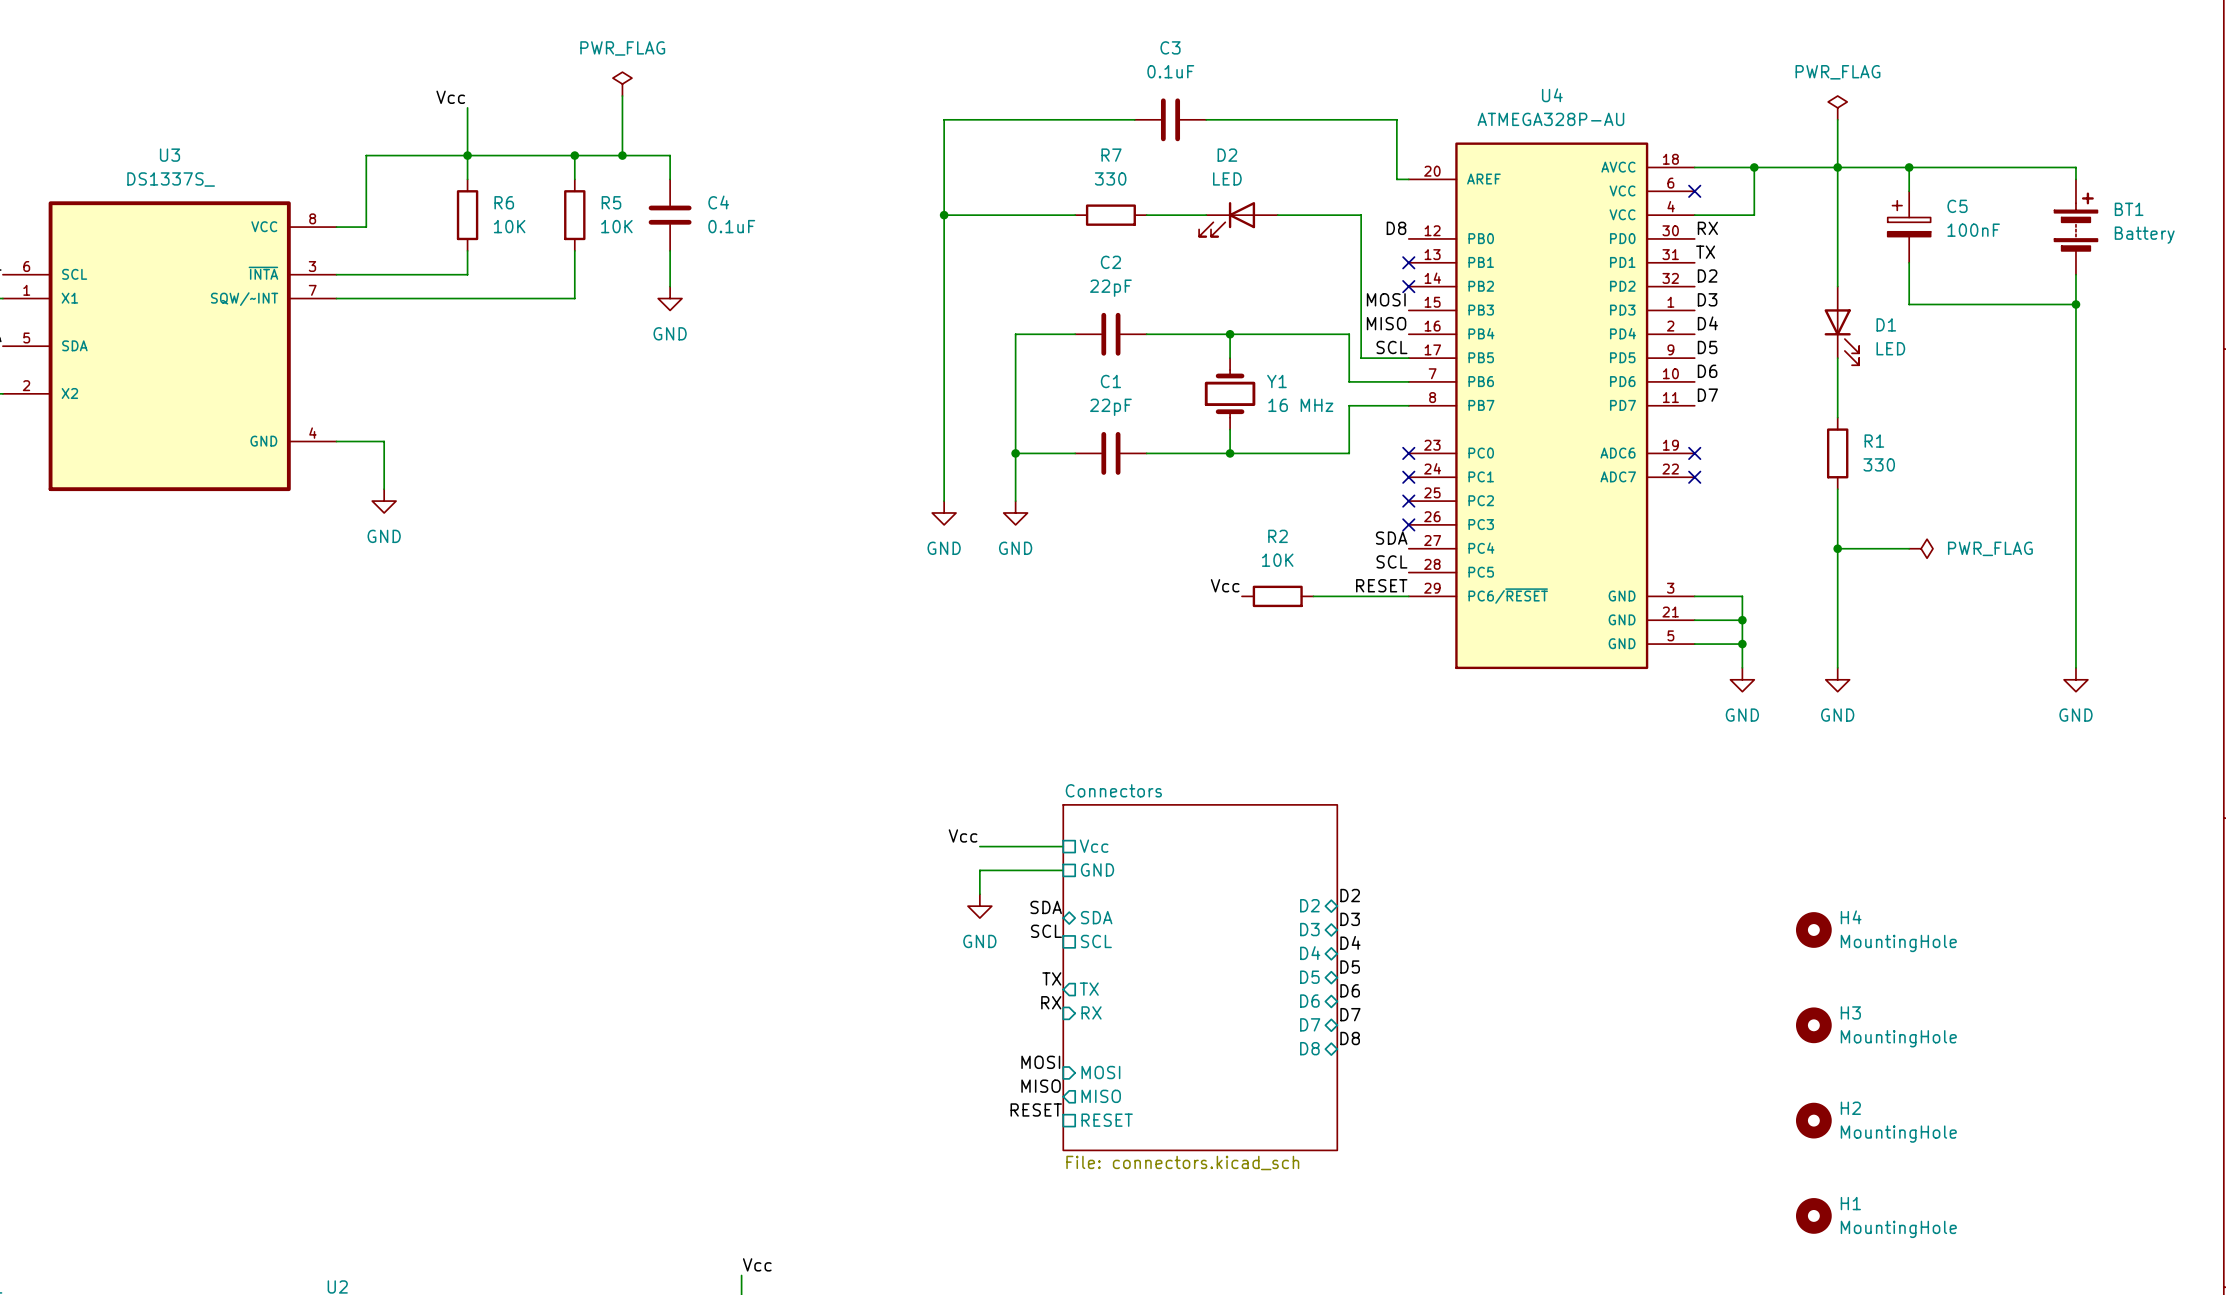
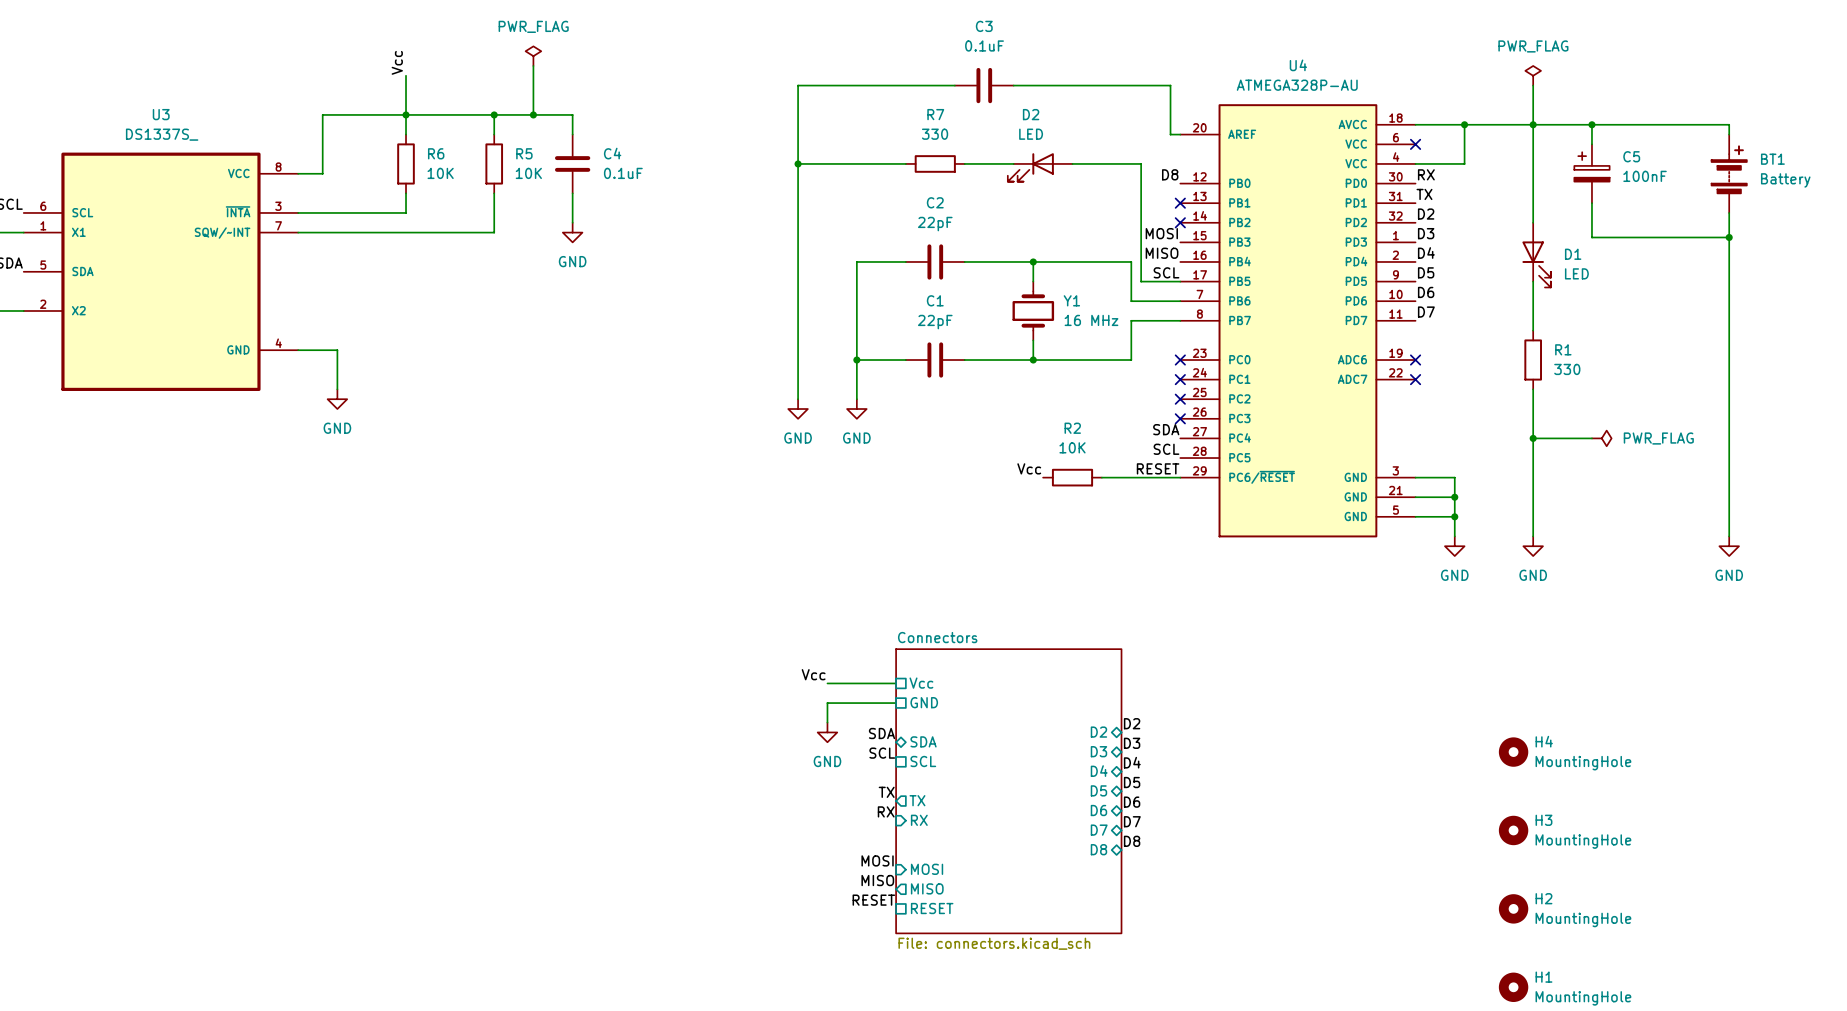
label rotation: 0° (450, 97) -> 90° counterclockwise (397, 62)

